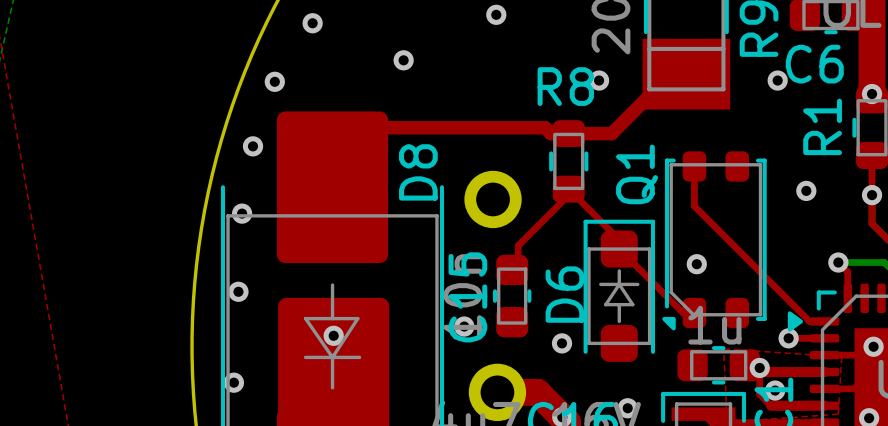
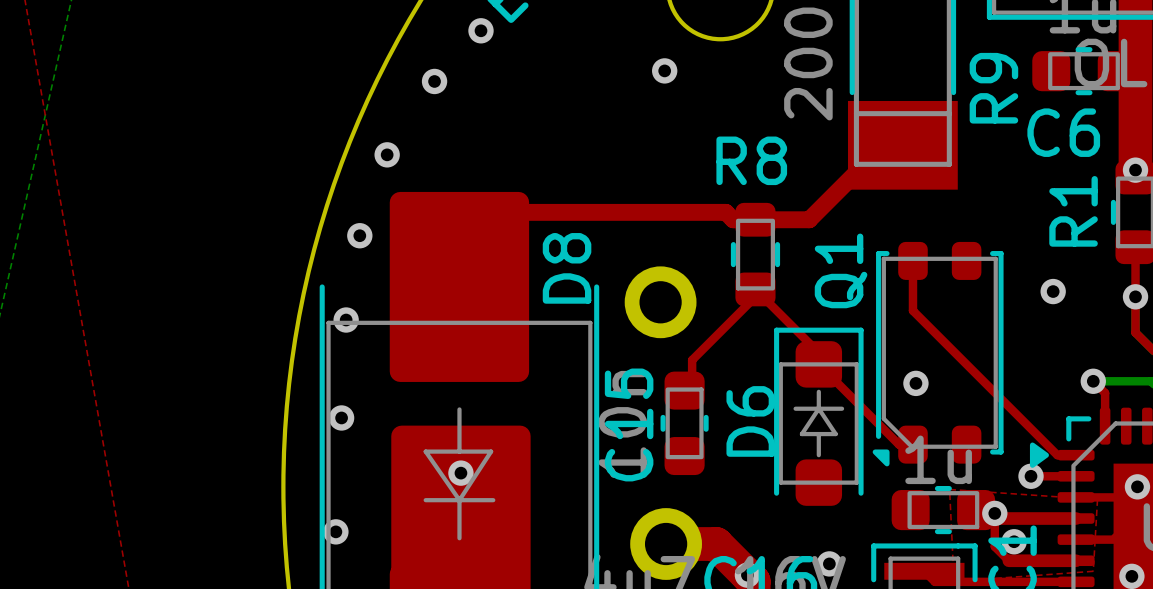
via: (403, 60) -> none
via: (599, 80) -> none
via: (777, 80) -> none
via: (464, 326) -> none
via: (562, 343) -> none

